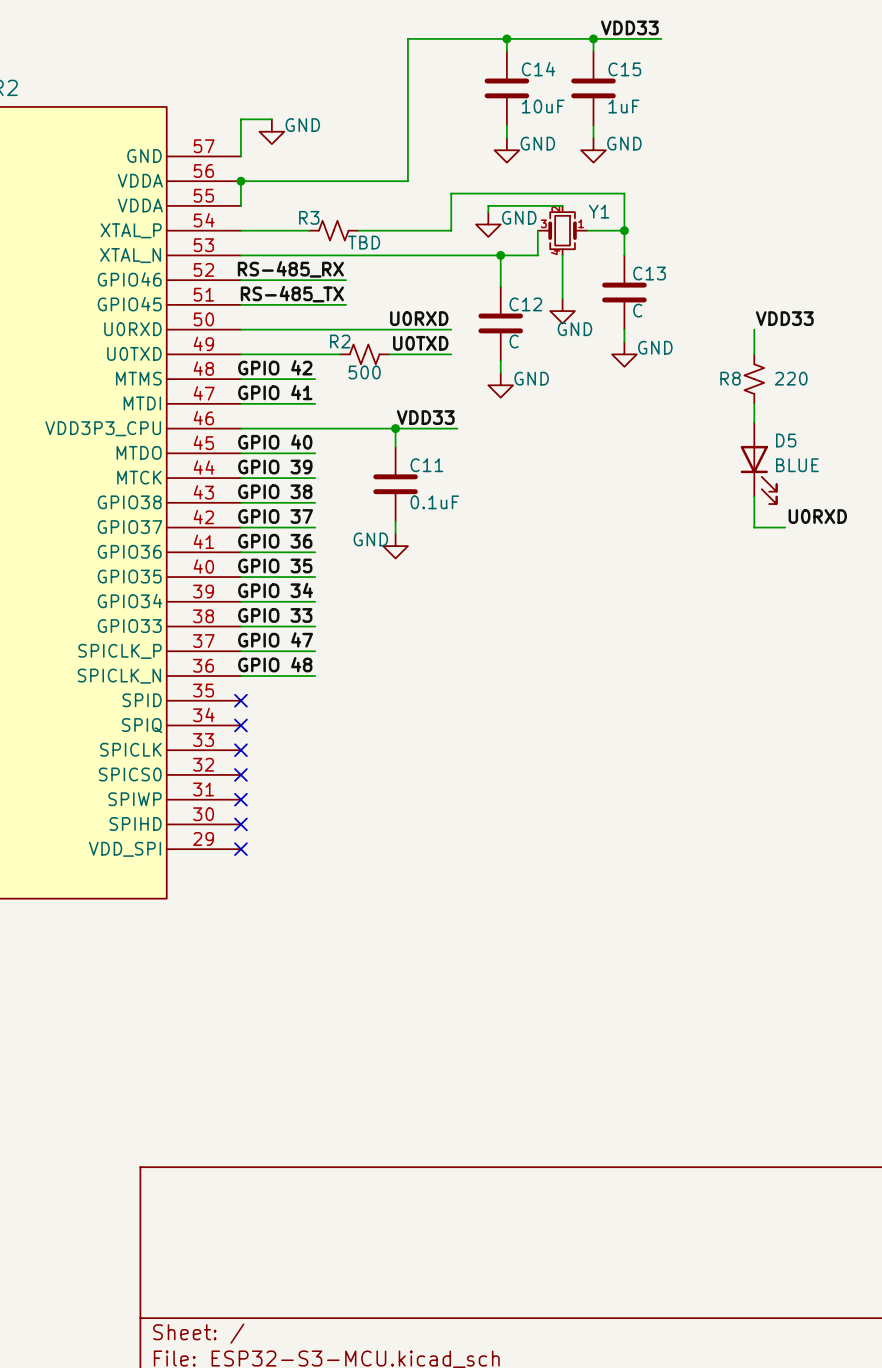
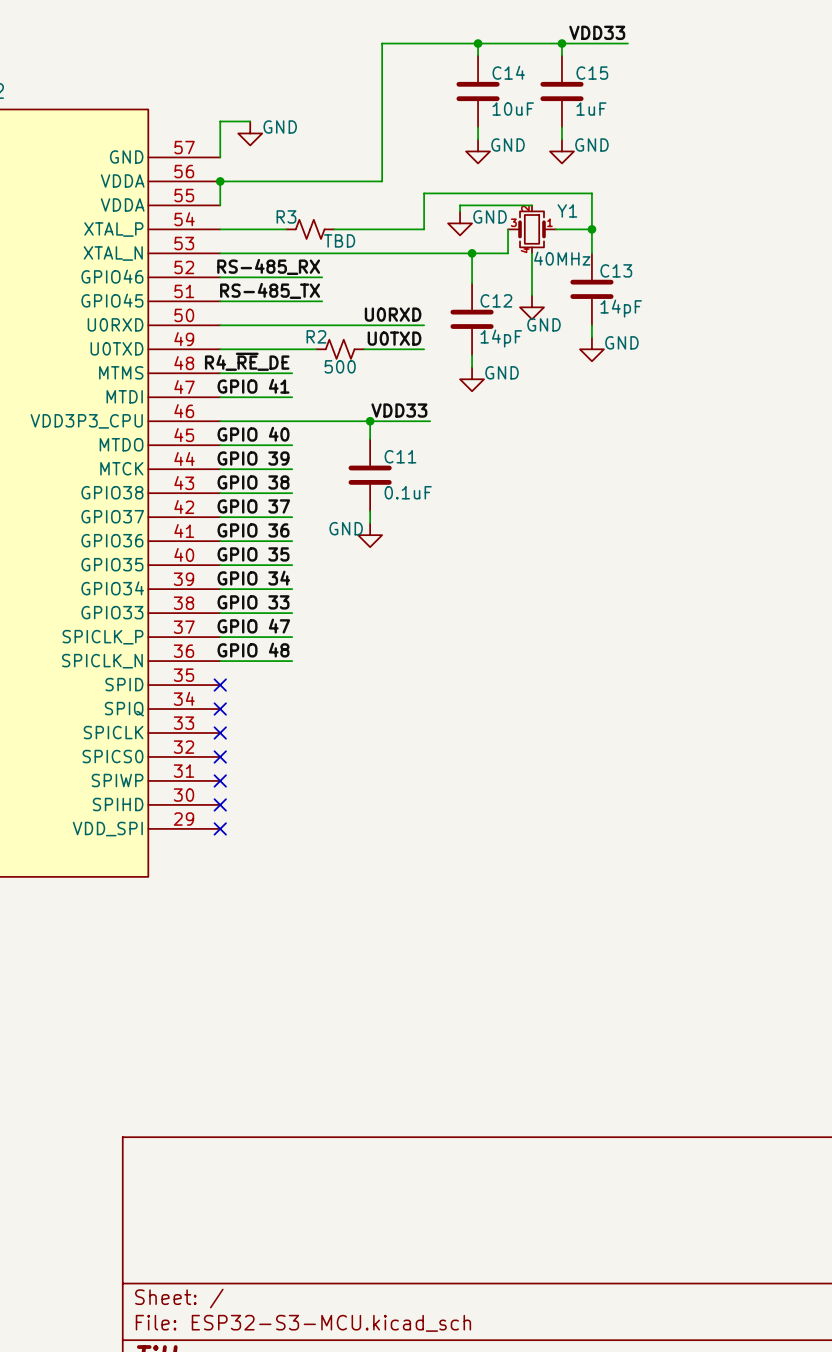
Y1 value: none -> 40MHz (562, 258)
C13 value: C (637, 310) -> 14pF (621, 308)
label: VDD33 (784, 318) -> none
wire: (754, 329) (754, 354) -> none
C12 value: C (514, 341) -> 14pF (501, 338)
label: GPIO 42 (275, 367) -> R4_~{RE}_DE (247, 361)
R8: 220 (754, 379) -> none
wire: (754, 403) (754, 422) -> none
D5: BLUE (758, 463) -> none
wire: (754, 496) (754, 527) (785, 527) -> none
label: U0RXD (817, 516) -> none

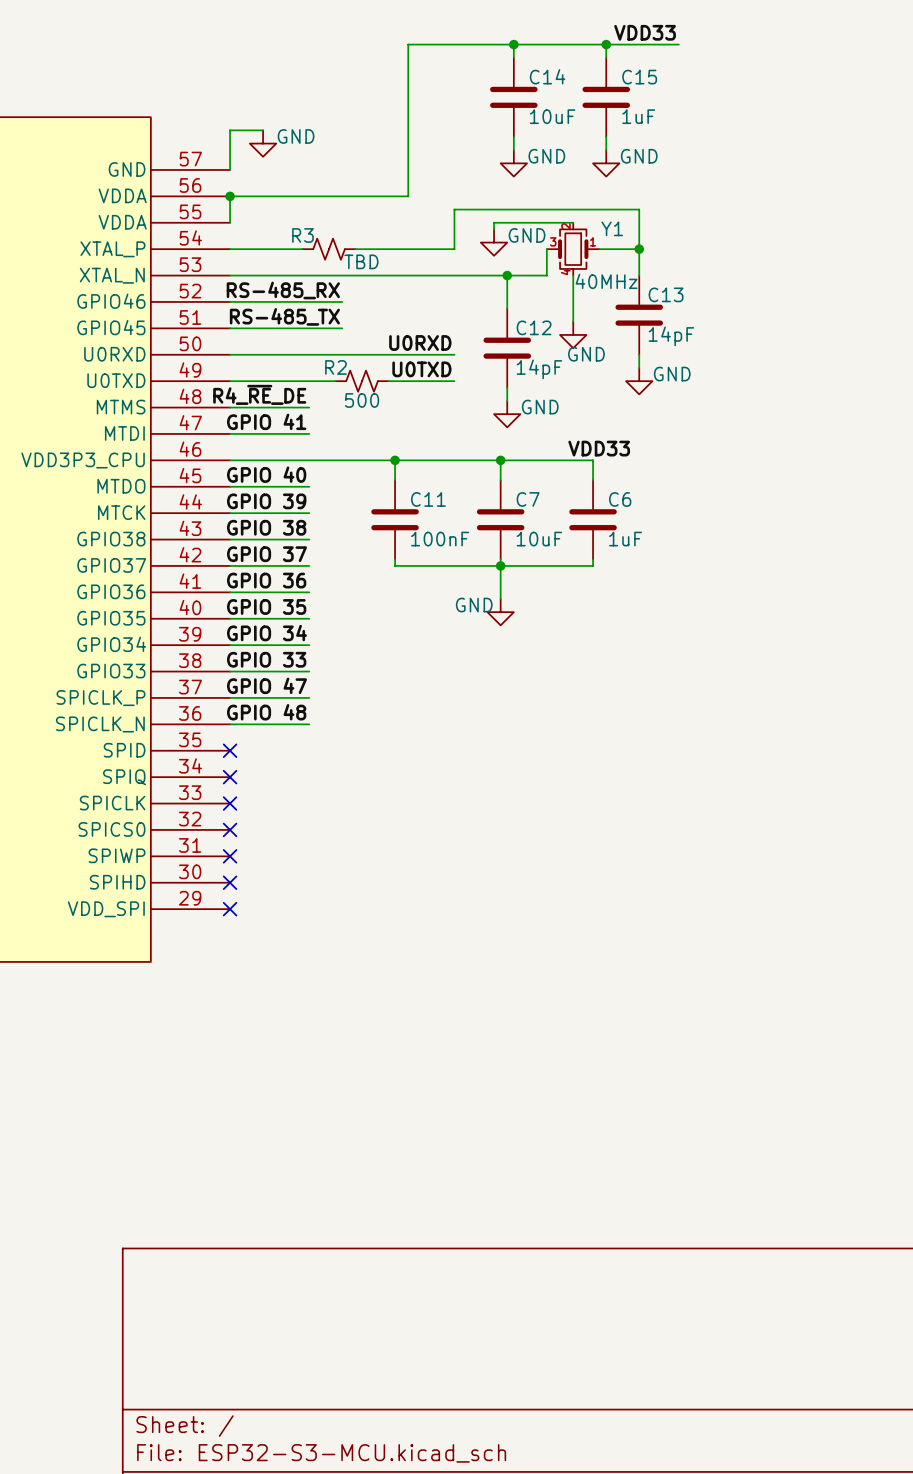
label position: VDD33 (399, 410) -> VDD33 (599, 448)
wire: none -> (461, 460) (593, 460) (593, 480)
wire: none -> (500, 460) (500, 480)
junction: none -> (500, 460)
C7: none -> 10uF (500, 519)
C6: none -> 1uF (593, 519)
C11 value: 0.1uF (408, 492) -> 100nF (440, 539)
wire: none -> (500, 559) (500, 598)
wire: (370, 517) (370, 523) -> (395, 565) (593, 565) (593, 559)
junction: none -> (500, 565)
power symbol position: GND (370, 535) -> GND (500, 612)

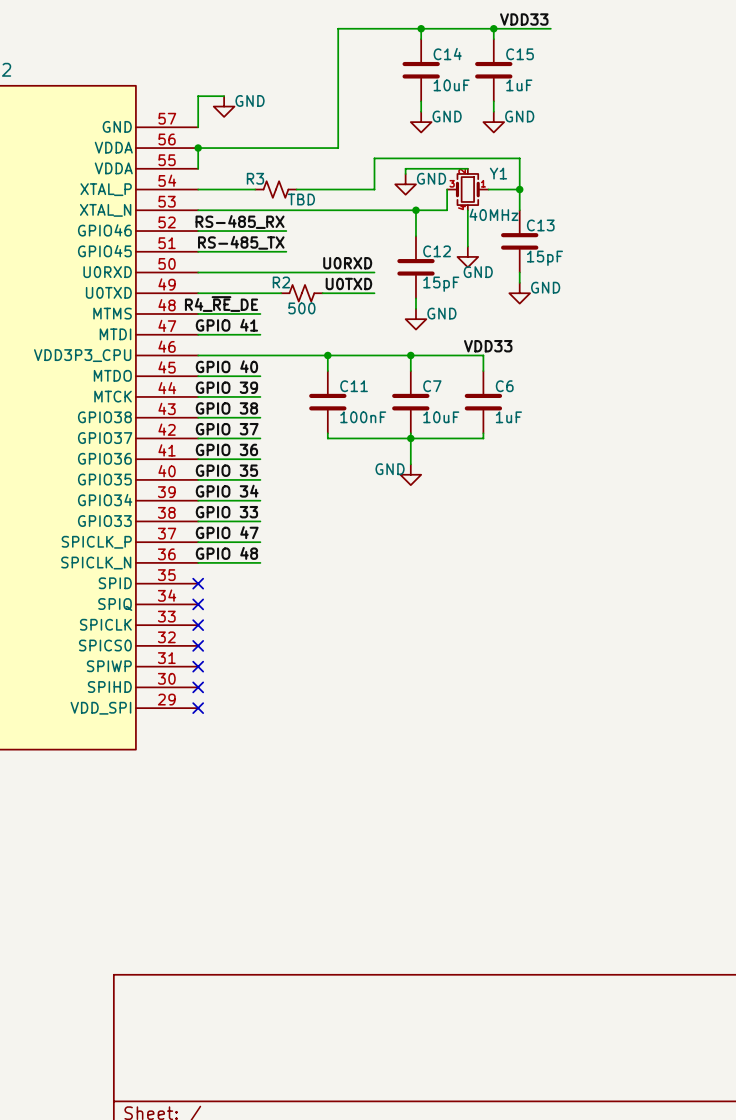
C13 value: 14pF (671, 336) -> 15pF (544, 258)
C12 value: 14pF (539, 369) -> 15pF (441, 284)

